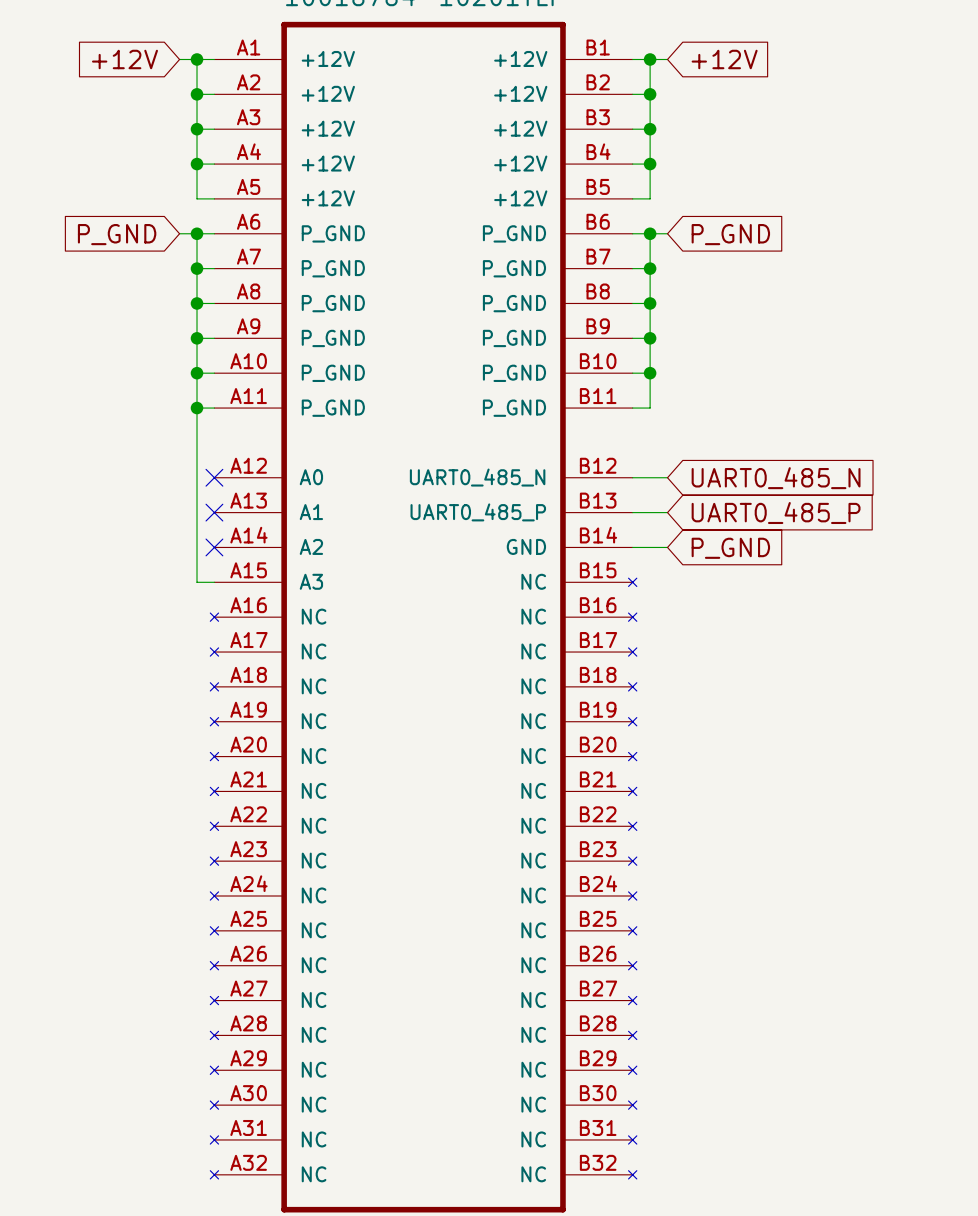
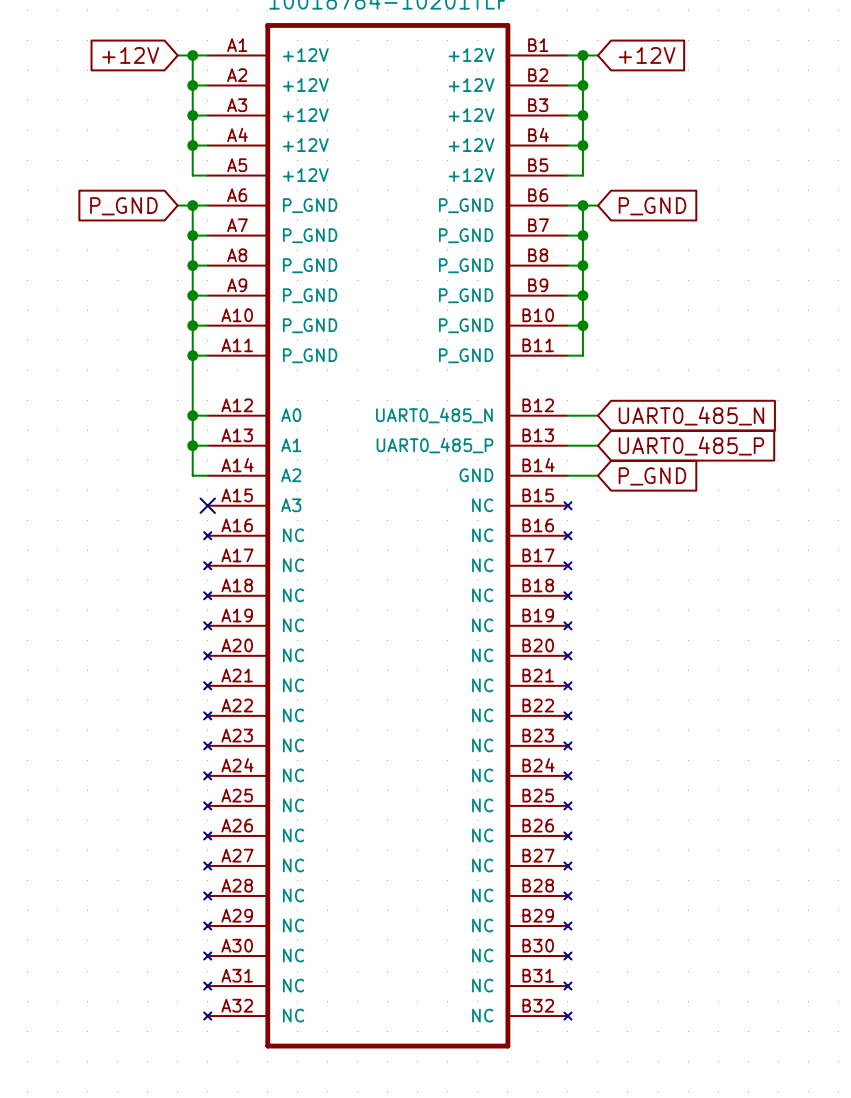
wire: none -> (192, 415) (207, 415)
junction: none -> (192, 415)
no-connect mark: (214, 477) -> none
wire: none -> (192, 445) (207, 445)
junction: none -> (192, 445)
no-connect mark: (214, 512) -> none
wire: (197, 547) (197, 582) (214, 582) -> (192, 475) (207, 475)
no-connect mark: (214, 547) -> none
no-connect mark: none -> (207, 505)

